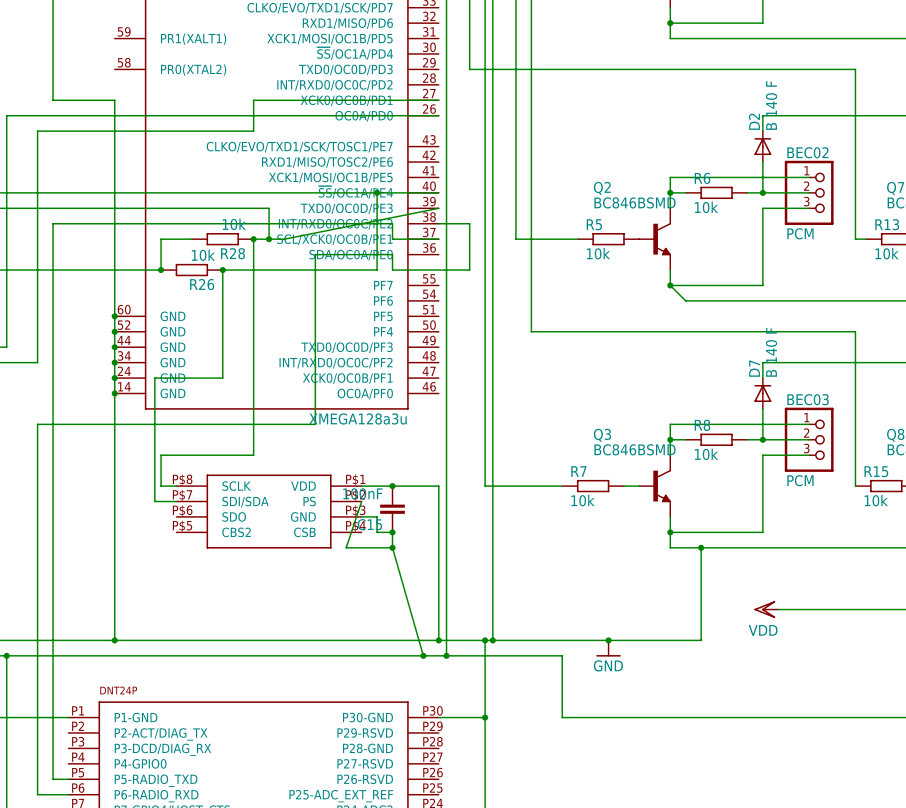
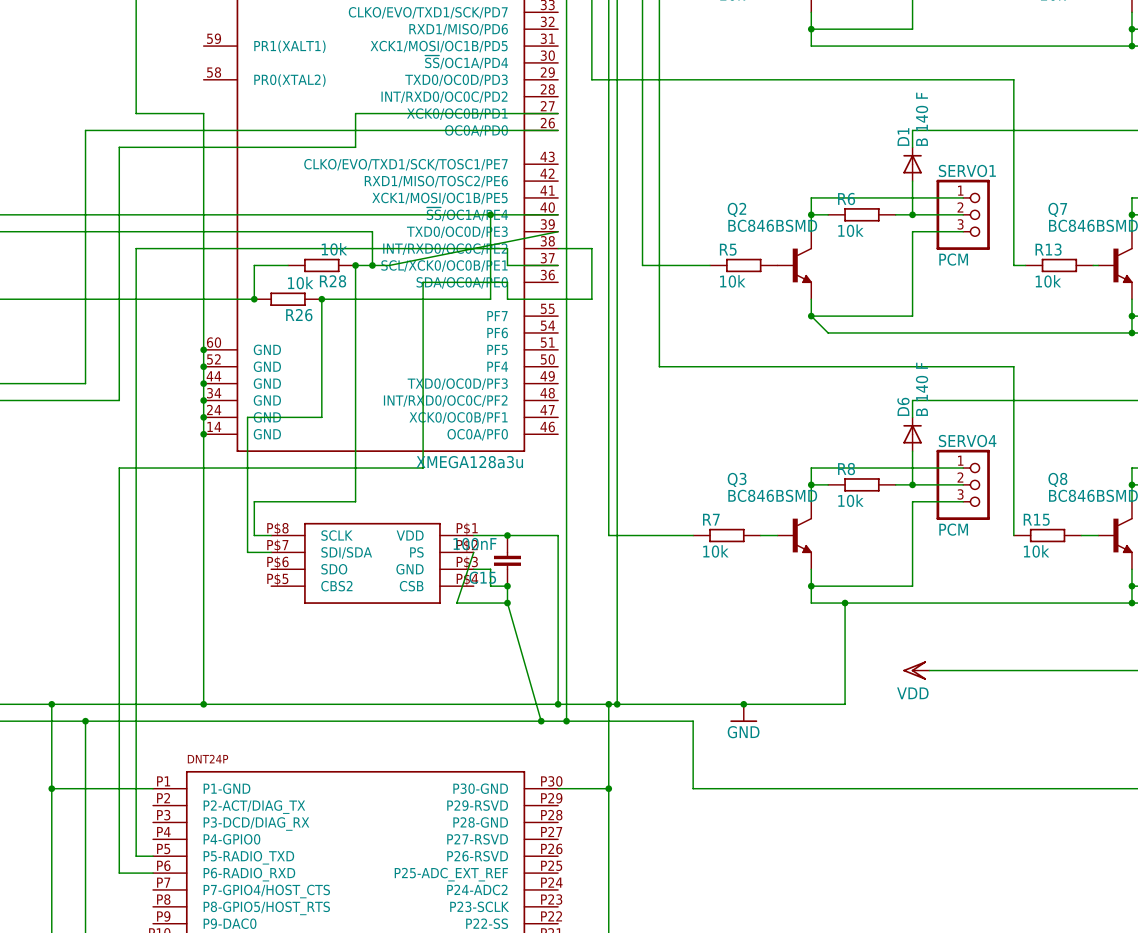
D2 name: D2 (754, 121) -> D1 (903, 137)
BEC02 name: BEC02 (807, 152) -> SERVO1 (967, 170)
D7 name: D7 (754, 368) -> D6 (903, 406)
BEC03 name: BEC03 (808, 399) -> SERVO4 (967, 441)

